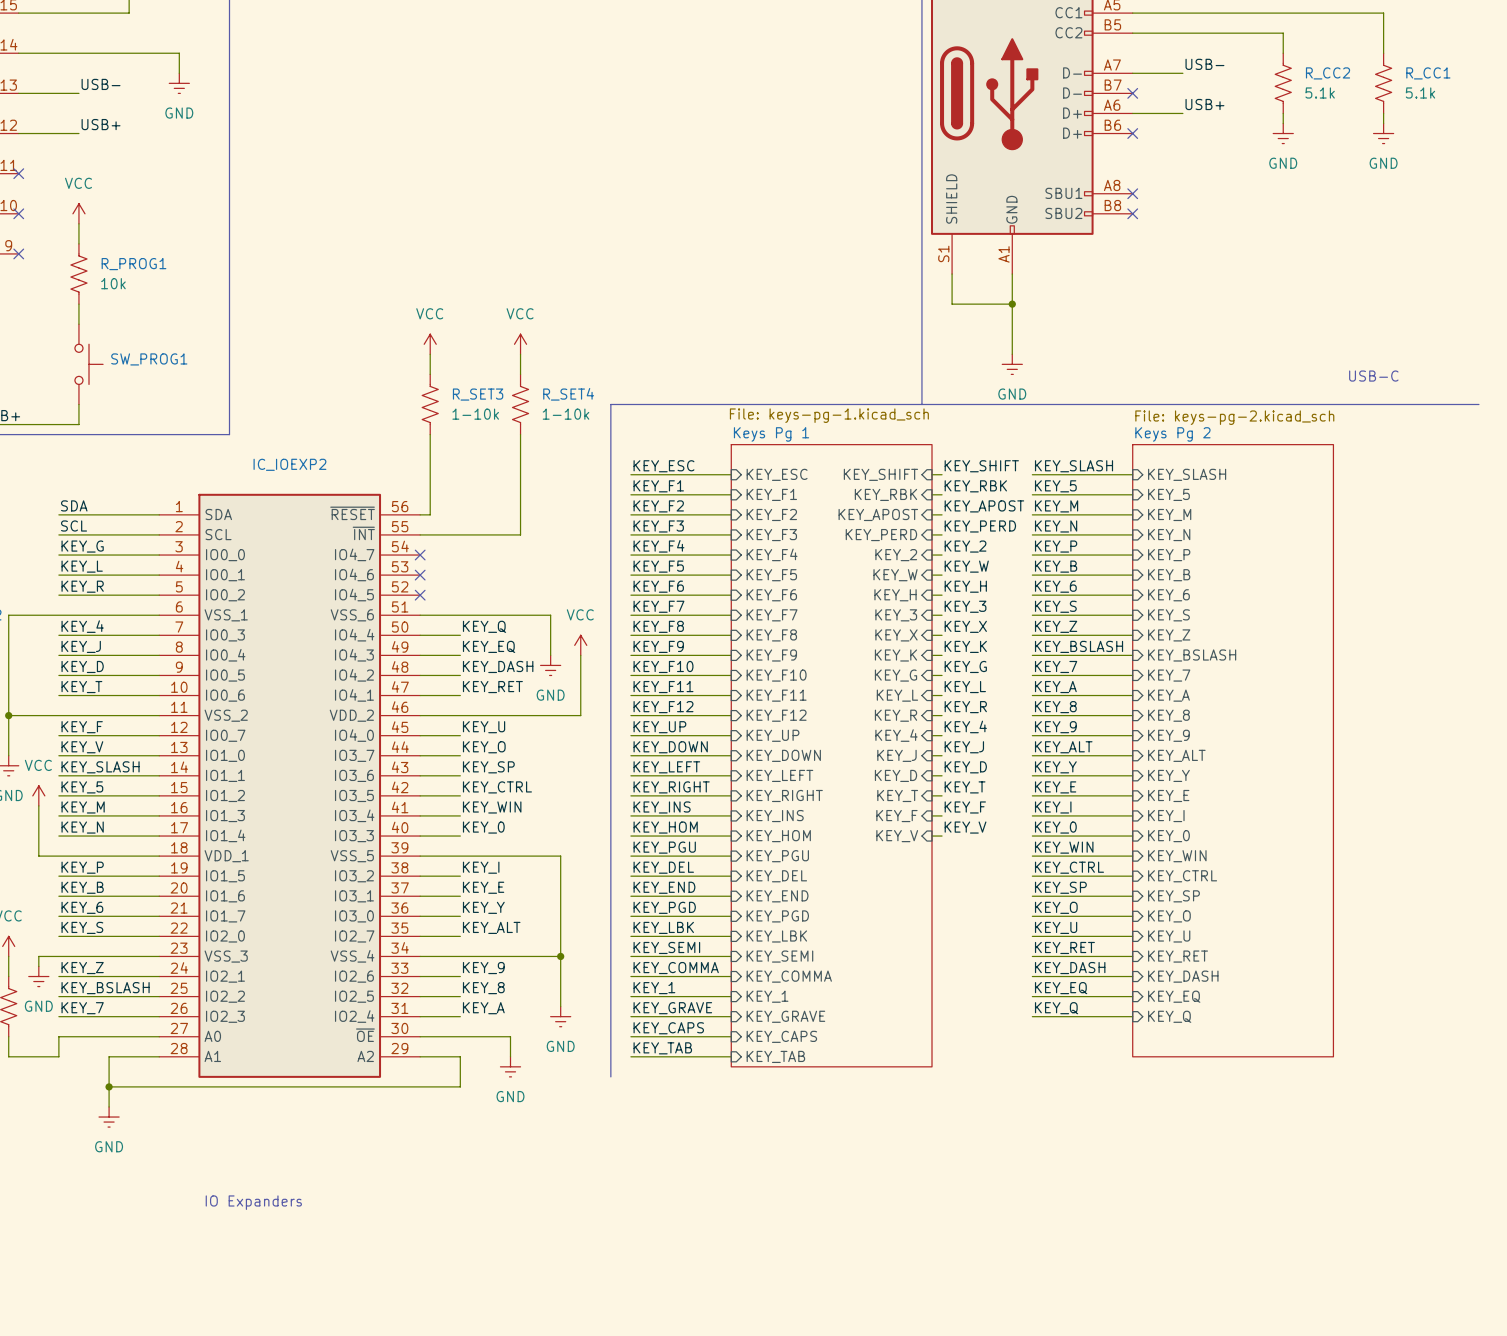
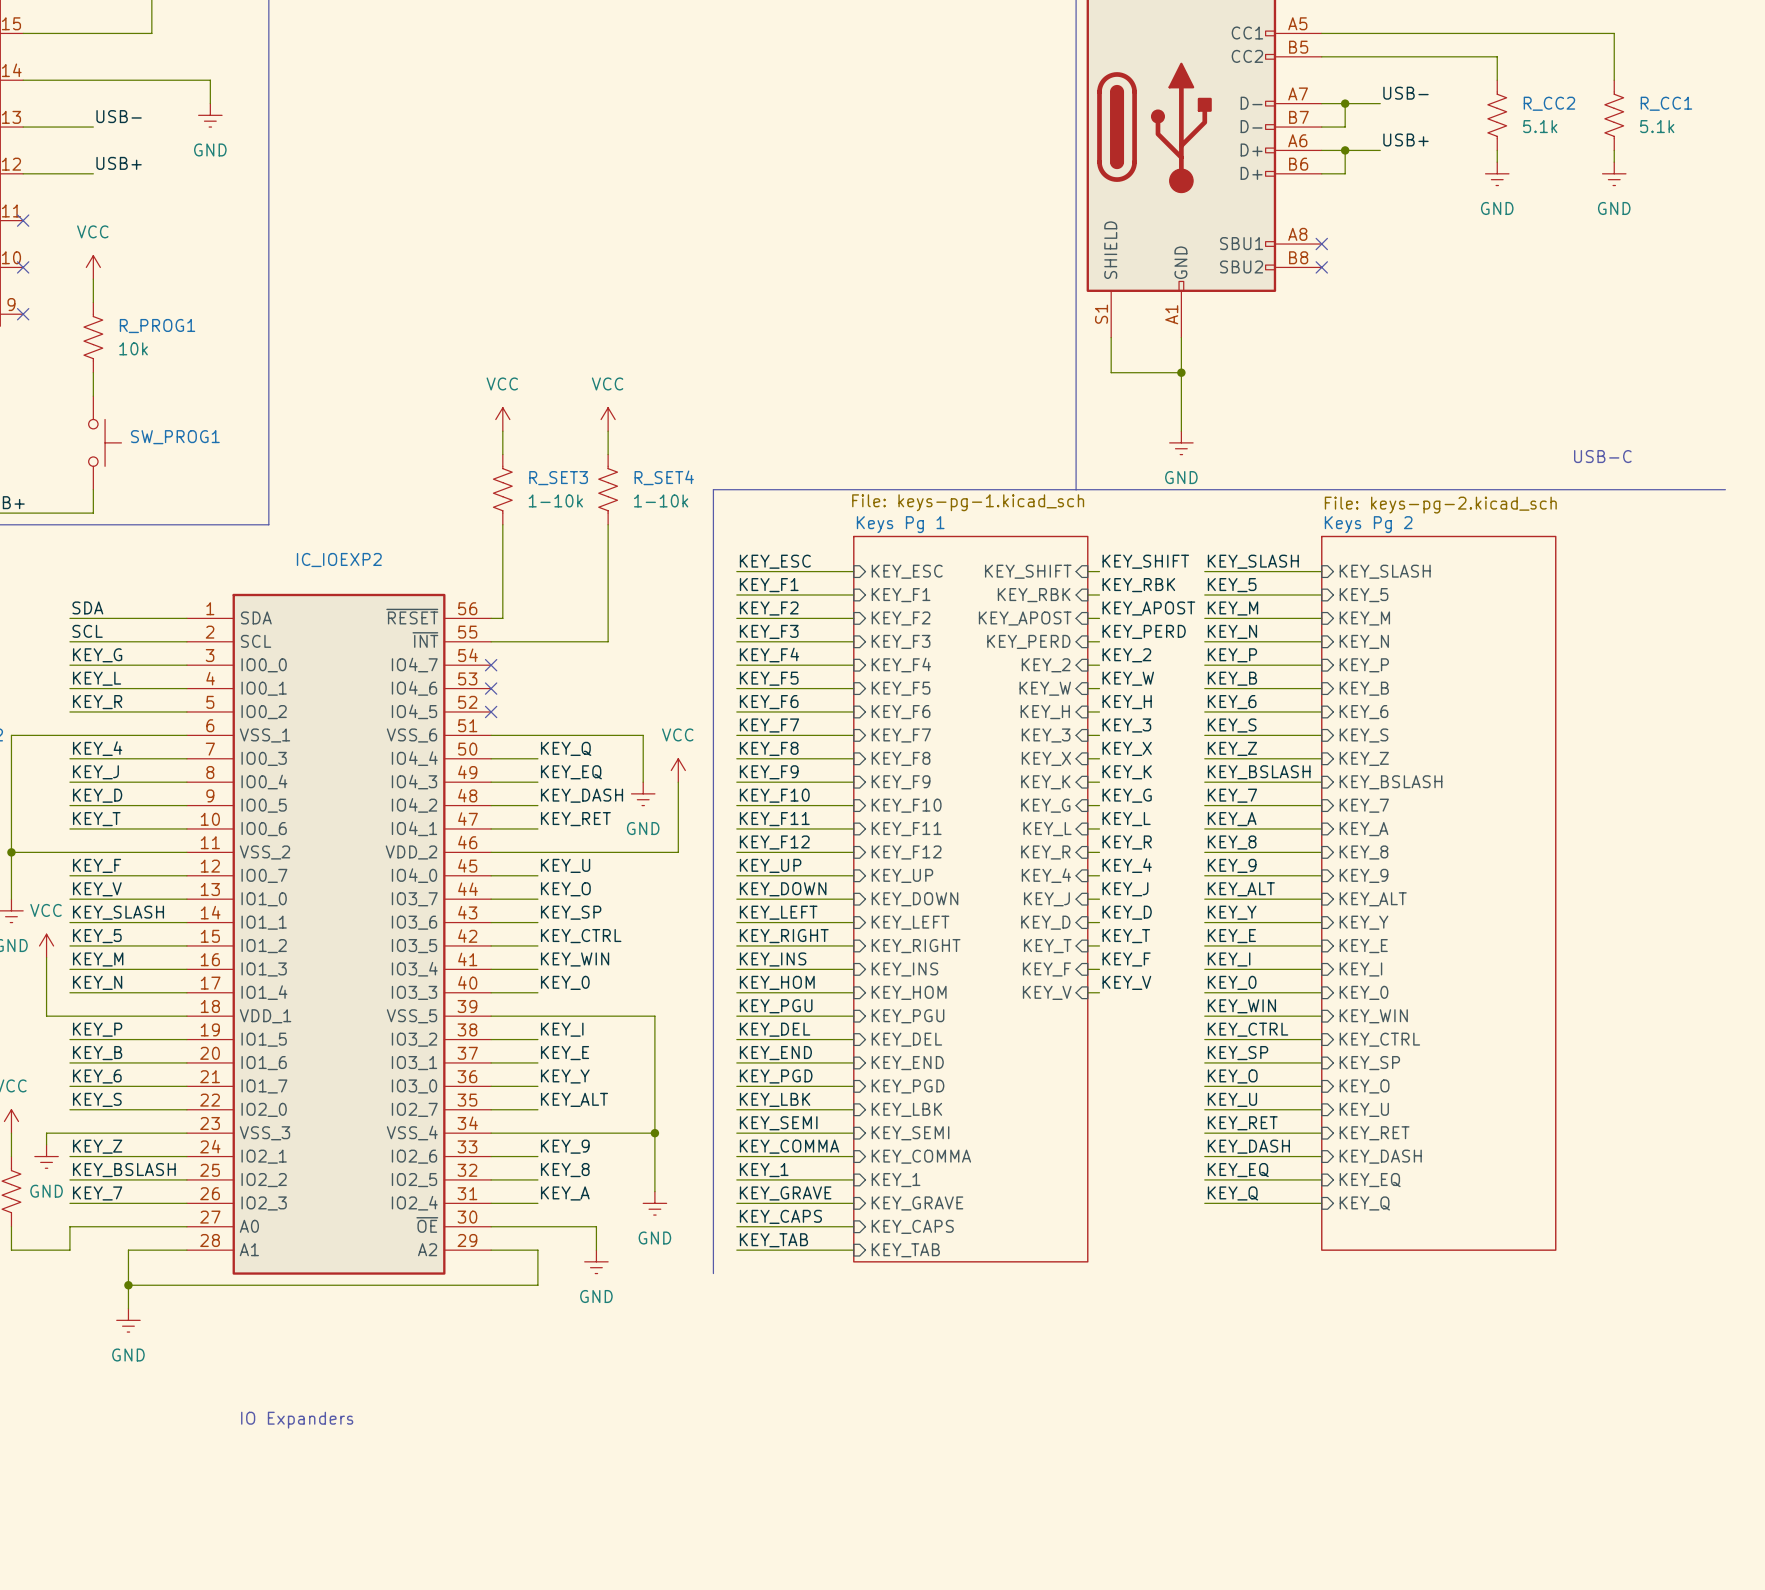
wire: none -> (1345, 103) (1345, 127) (1321, 127)
junction: none -> (1345, 103)
no-connect mark: (1132, 93) -> none
wire: none -> (1345, 150) (1345, 173) (1321, 173)
junction: none -> (1345, 150)
no-connect mark: (1132, 133) -> none

